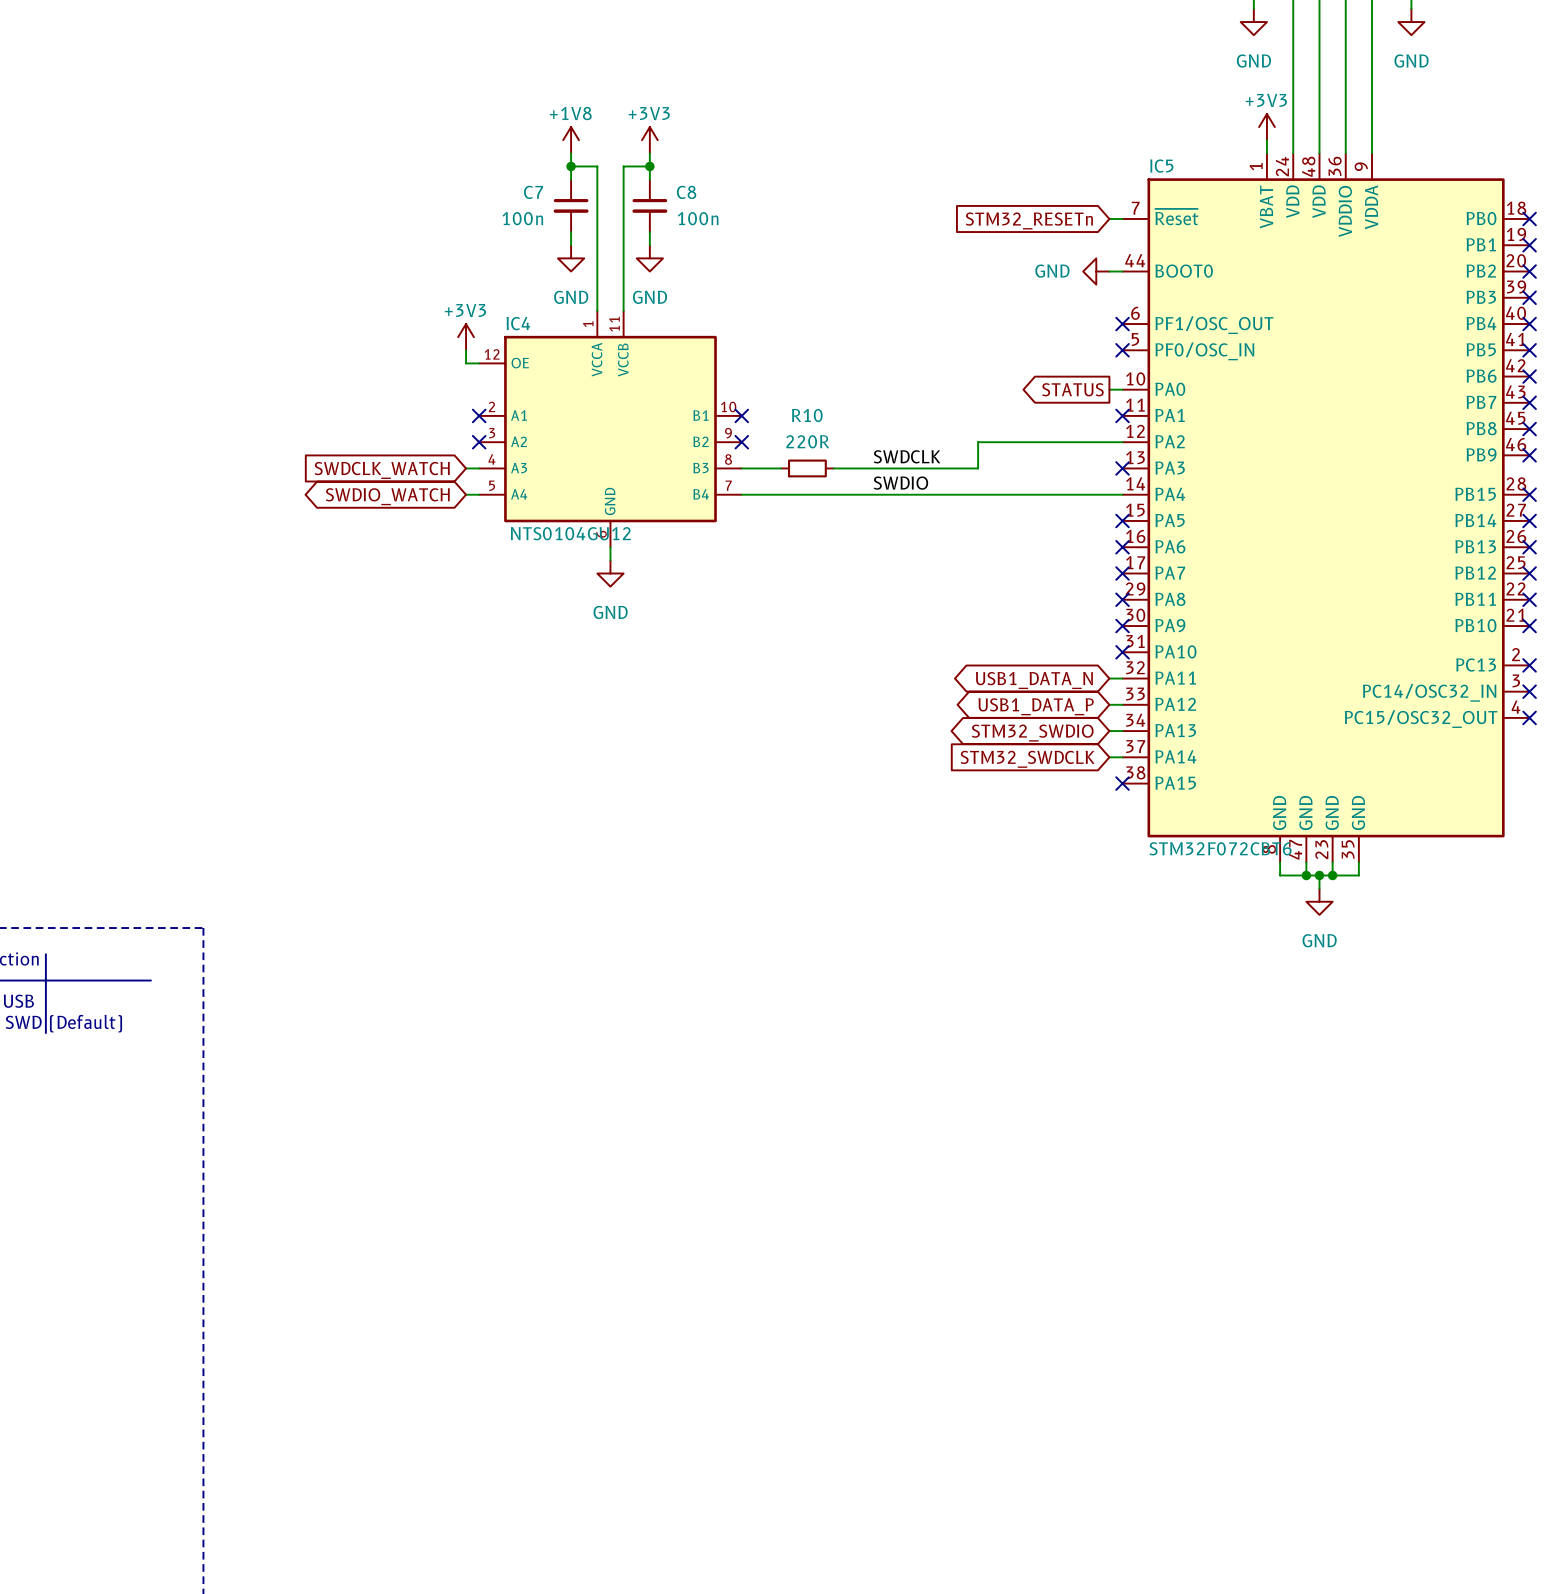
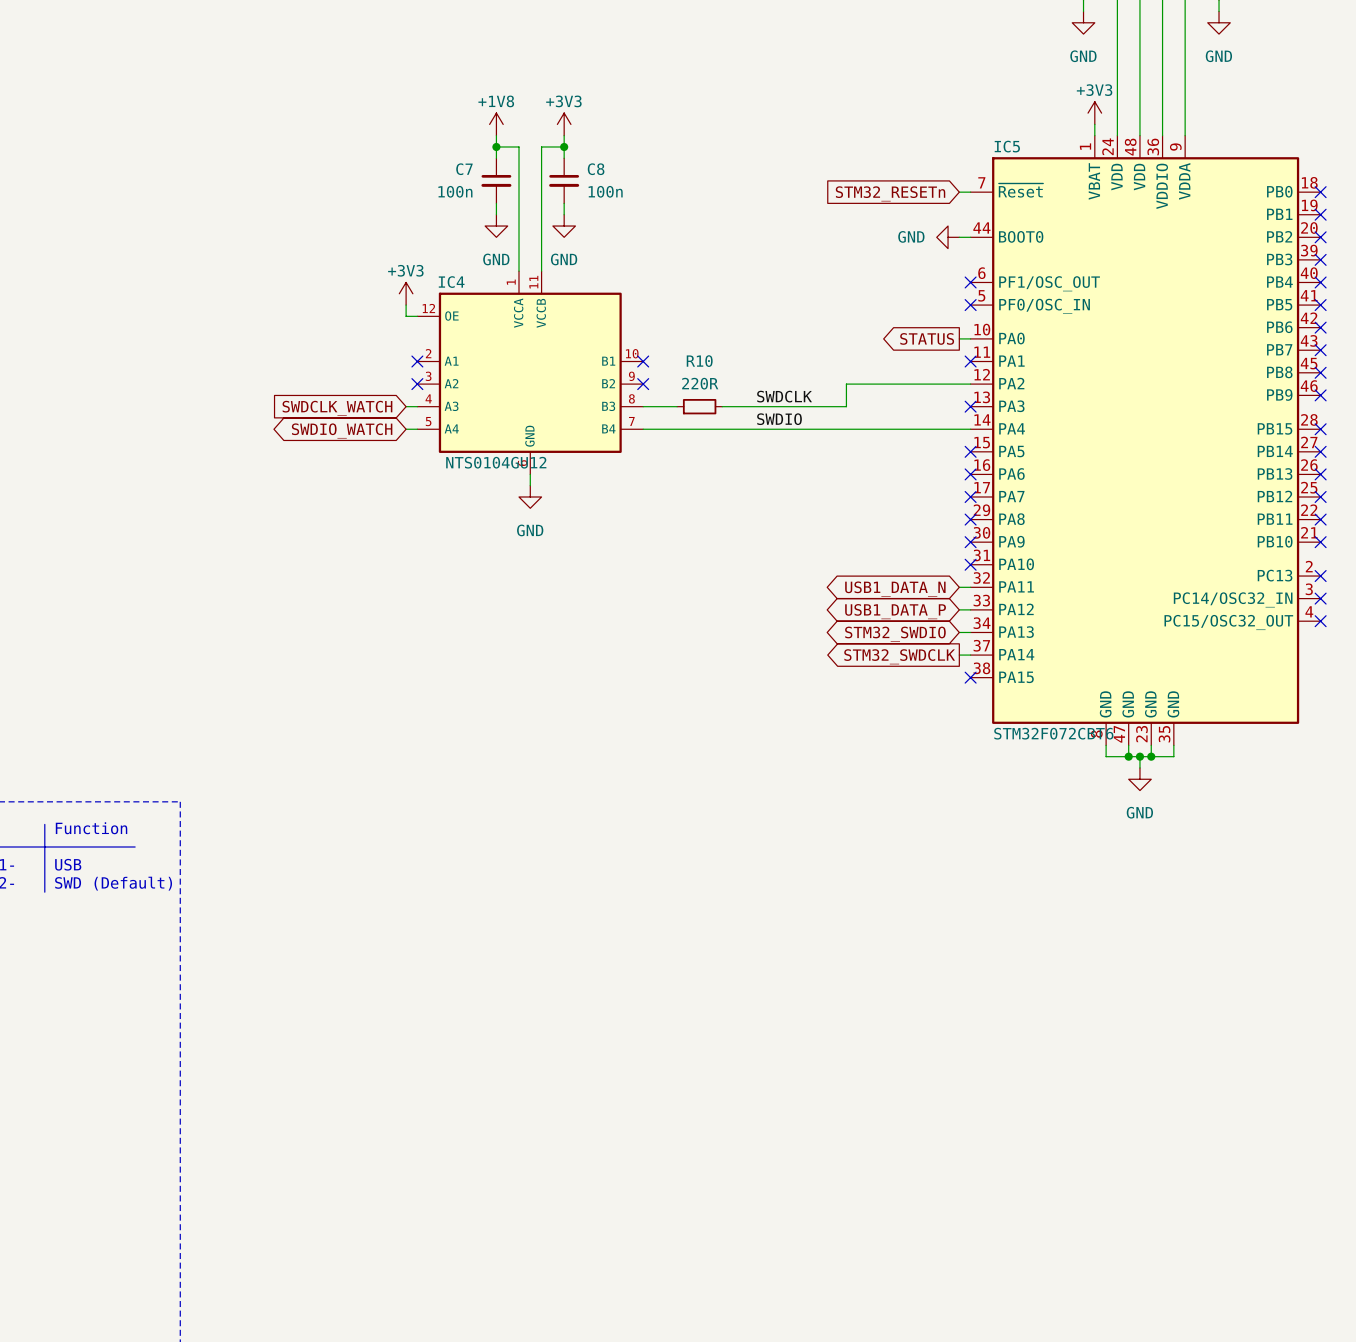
global label shape: input (1027, 759) -> output (899, 656)

